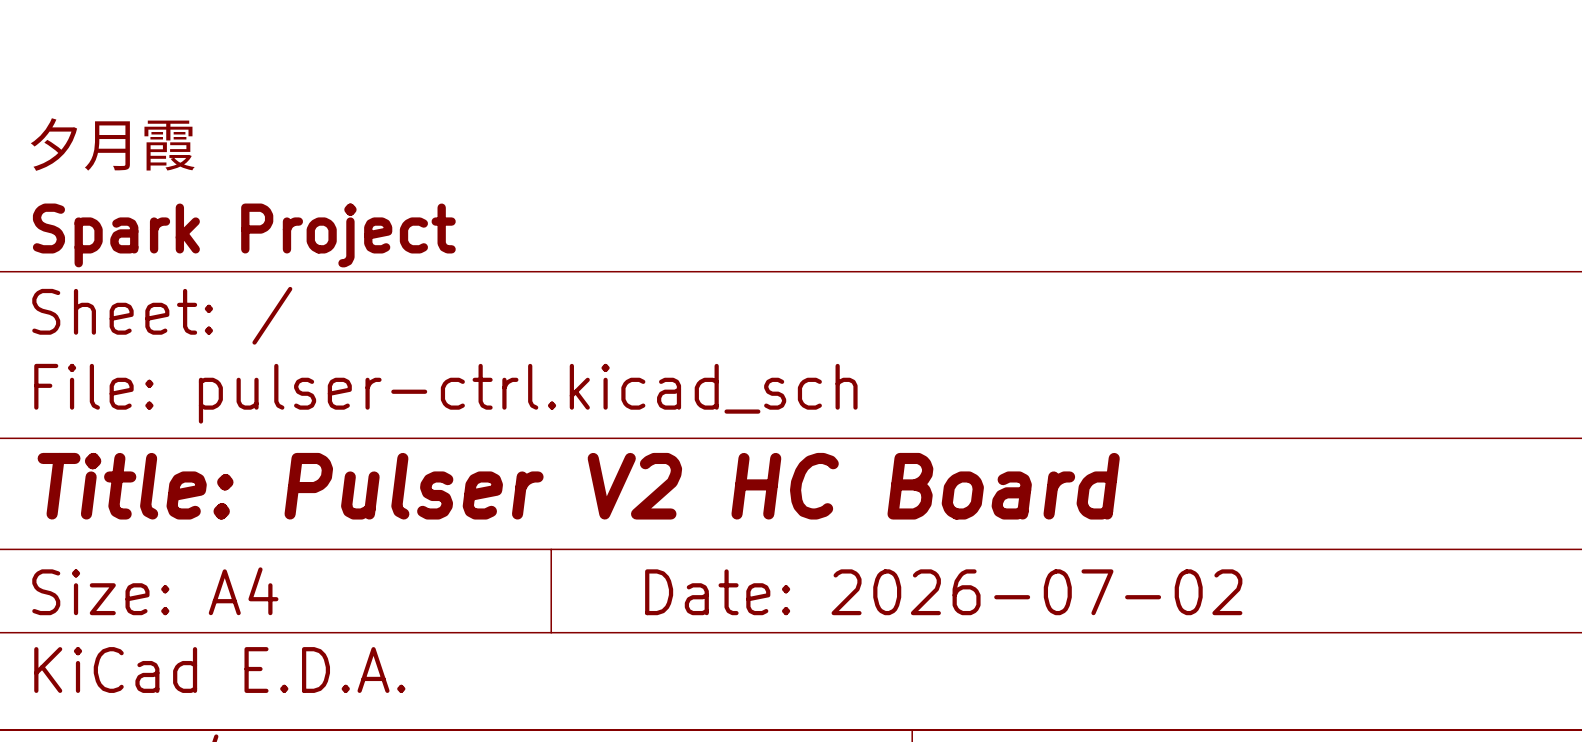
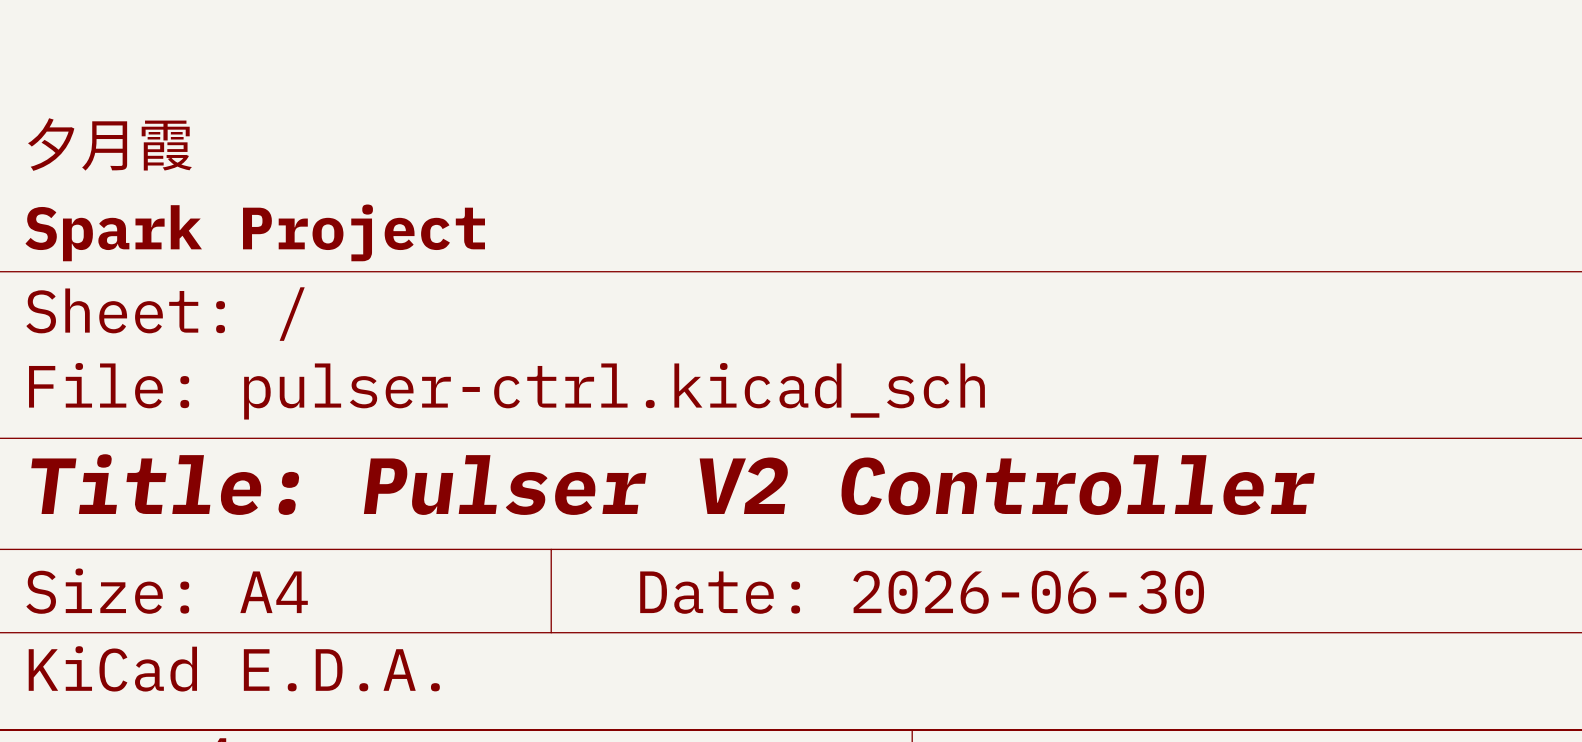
title block: Title: Pulser V2 HC Board (578, 486) -> Title: Pulser V2 Controller (673, 484)
title block: Date: 2026-07-02 (943, 592) -> Date: 2026-06-30 (922, 592)

